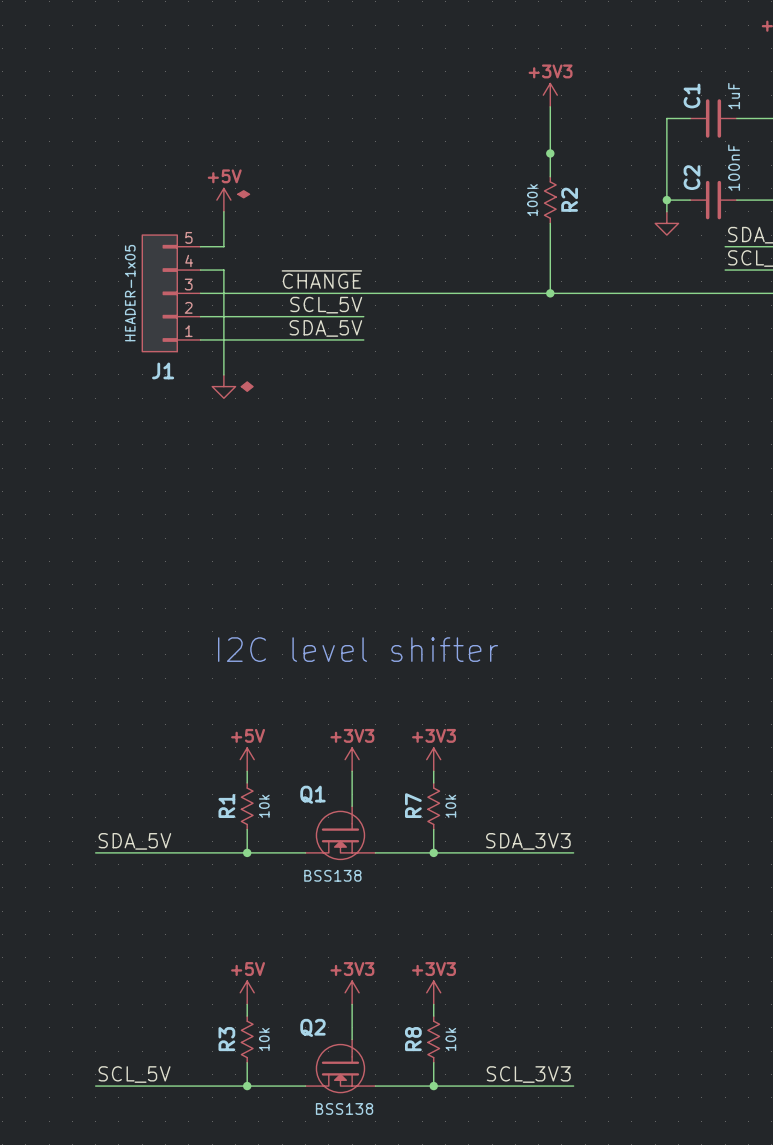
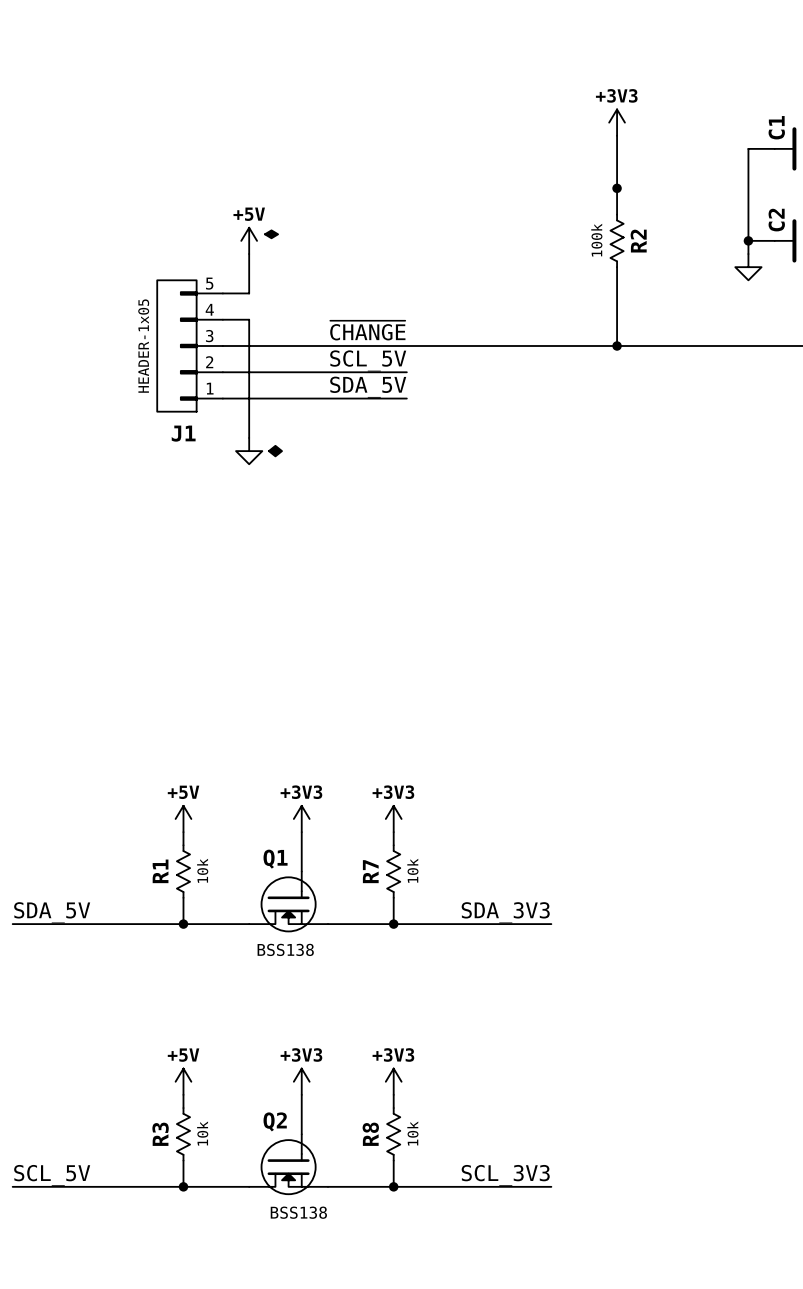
text: I2C level shifter (358, 649) -> none
power symbol: none -> (301, 818)
wire: none -> (301, 832) (301, 871)
power symbol position: (247, 759) -> (183, 818)
power symbol position: (352, 759) -> (393, 818)
power symbol: (433, 759) -> none
wire: (247, 771) (247, 782) -> (183, 832) (183, 845)
wire: (433, 771) (433, 782) -> (393, 832) (393, 845)
Q1 name position: Q1 (312, 794) -> Q1 (275, 859)
junction: none -> (183, 924)
R1 position: (247, 806) -> (183, 871)
junction: none -> (393, 924)
R7 position: (433, 806) -> (393, 871)
wire: (247, 829) (247, 852) -> (183, 897) (183, 924)
wire: (433, 829) (433, 852) -> none
Q1 position: (340, 832) -> (288, 901)
label position: SDA_5V (134, 841) -> SDA_5V (52, 912)
label position: SDA_3V3 (528, 841) -> SDA_3V3 (505, 912)
wire: (95, 852) (305, 852) -> (12, 924) (249, 924)
junction: (247, 852) -> none
wire: (375, 852) (573, 852) -> (328, 924) (551, 924)
junction: (433, 852) -> none
power symbol: none -> (301, 1081)
wire: none -> (301, 1094) (301, 1134)
power symbol position: (247, 992) -> (183, 1081)
power symbol position: (352, 992) -> (393, 1081)
power symbol: (433, 992) -> none
wire: (247, 1004) (247, 1016) -> (183, 1094) (183, 1108)
wire: (433, 1004) (433, 1016) -> (393, 1094) (393, 1108)
Q2 name position: Q2 (312, 1027) -> Q2 (275, 1121)
junction: none -> (183, 1186)
R3 position: (247, 1039) -> (183, 1134)
junction: none -> (393, 1186)
R8 position: (433, 1039) -> (393, 1134)
wire: (247, 1062) (247, 1086) -> (183, 1160) (183, 1186)
wire: (433, 1062) (433, 1086) -> none
Q2 position: (340, 1066) -> (288, 1164)
label position: SCL_5V (134, 1074) -> SCL_5V (52, 1175)
label position: SCL_3V3 (528, 1074) -> SCL_3V3 (505, 1175)
wire: (95, 1086) (305, 1086) -> (12, 1186) (249, 1186)
junction: (247, 1086) -> none
wire: (375, 1086) (573, 1086) -> (328, 1186) (551, 1186)
junction: (433, 1086) -> none

